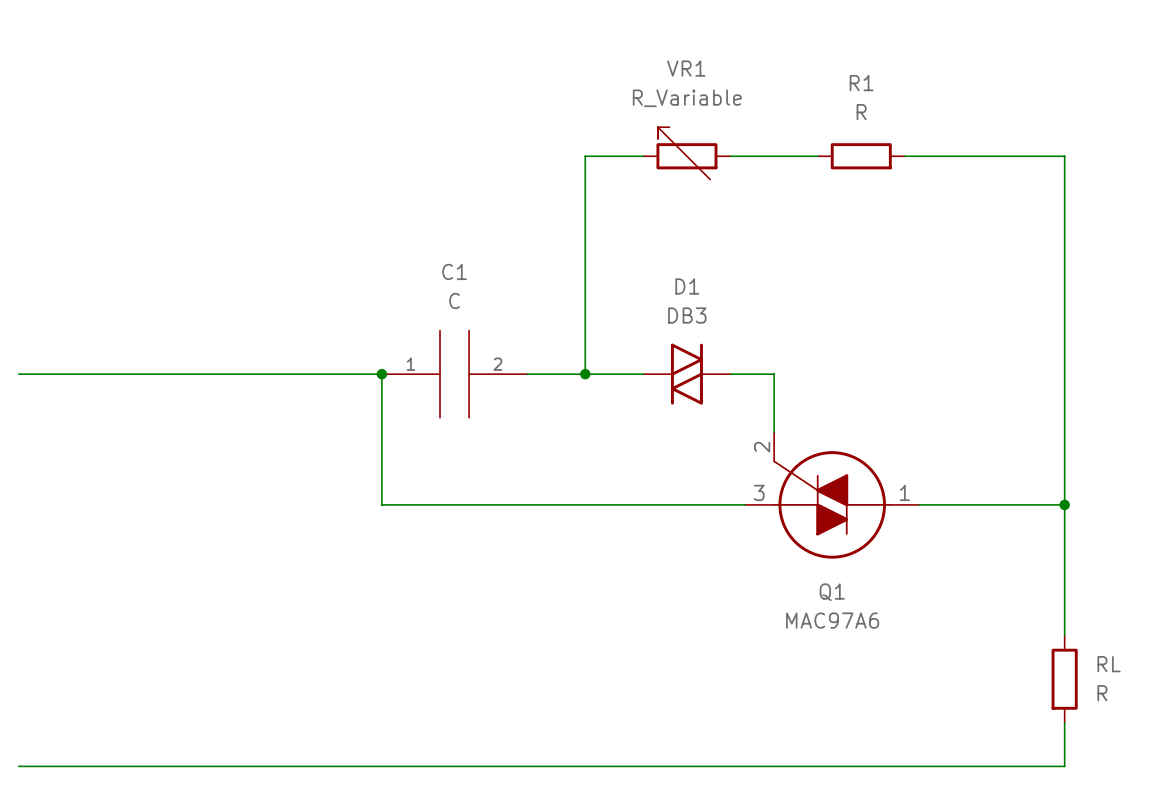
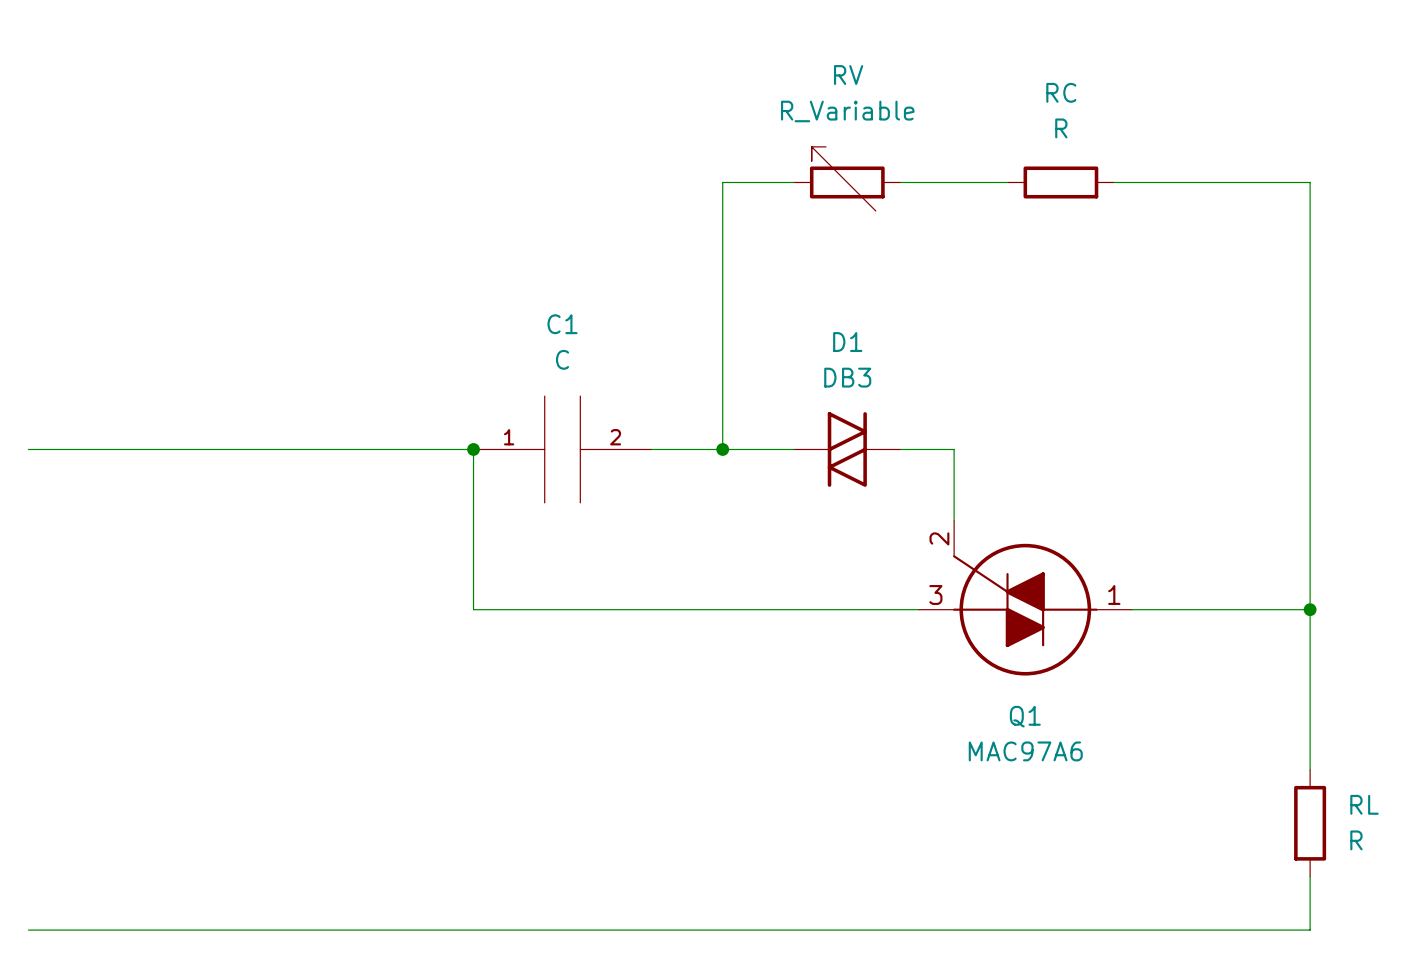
VR1 name: VR1 (686, 68) -> RV (848, 75)
R1 name: R1 (861, 83) -> RC (1061, 92)

